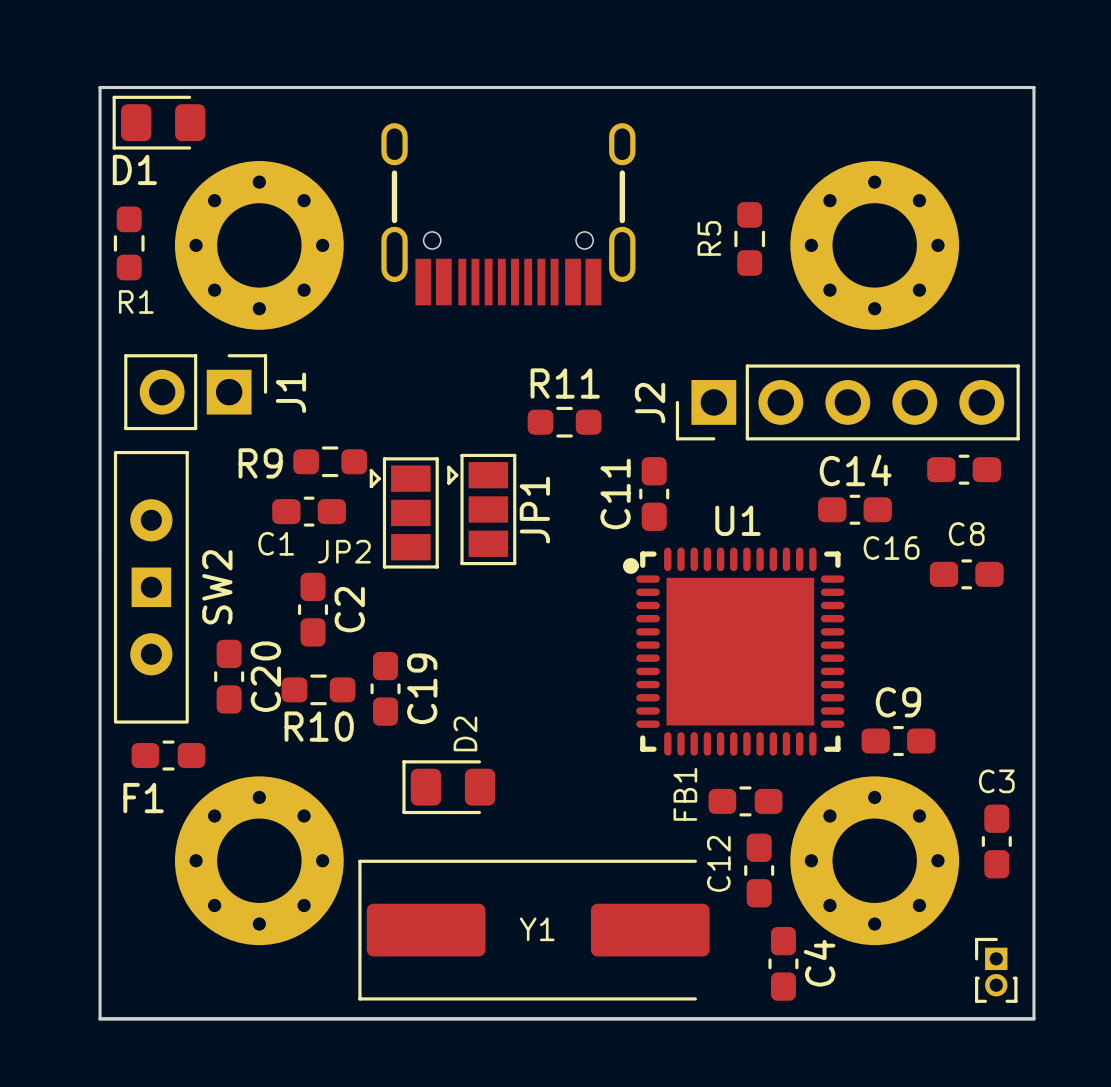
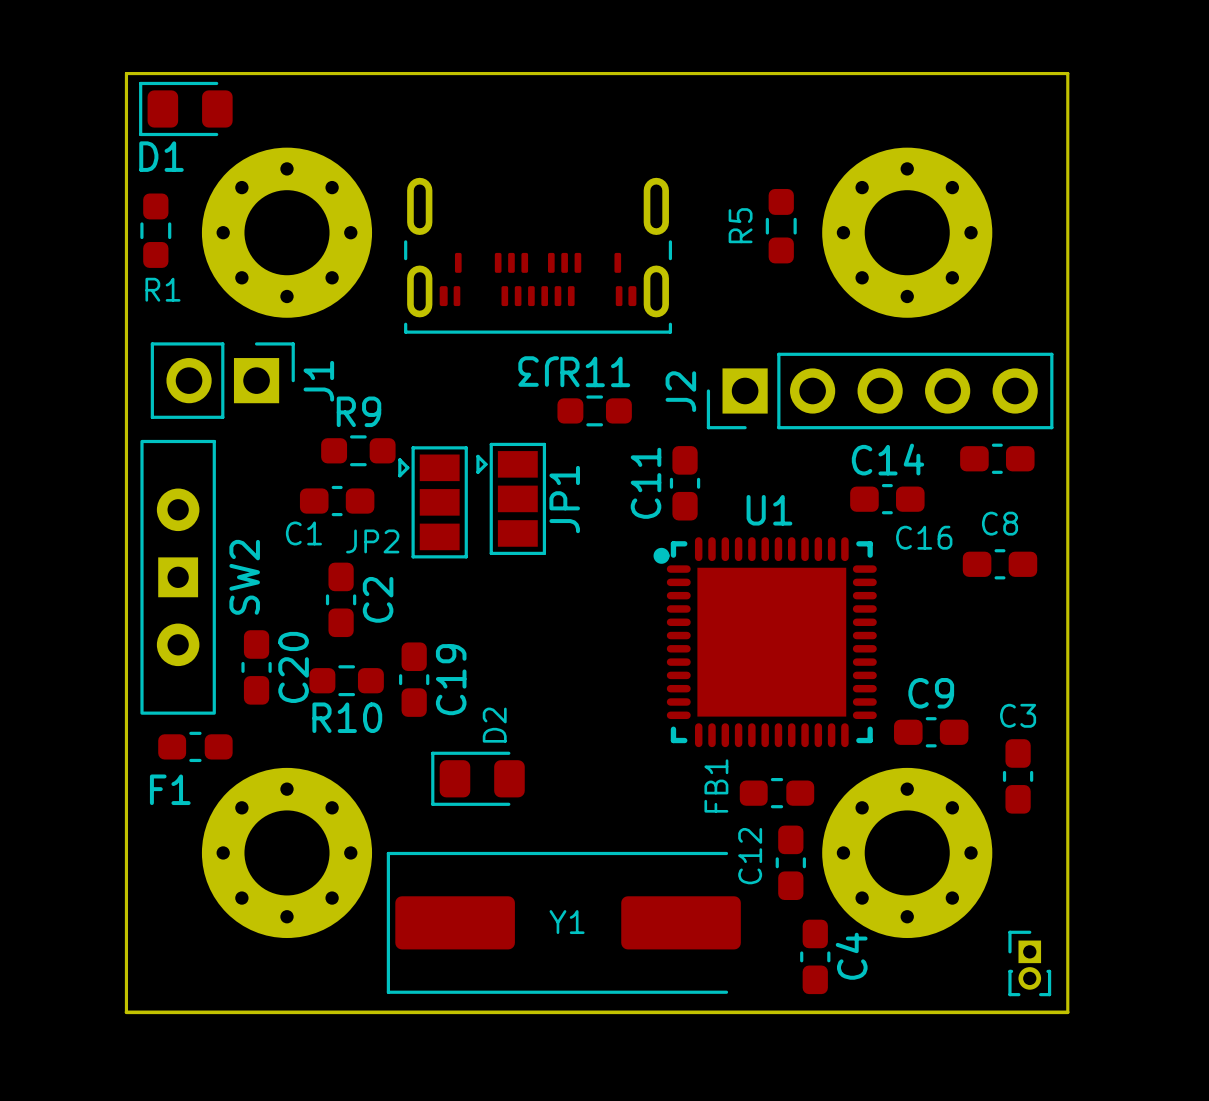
part: (508, 214) -> none
J3: none -> (538, 255)
R9 name position: R9 (260, 463) -> R9 (358, 411)
C3 position: (996, 841) -> (1018, 776)

